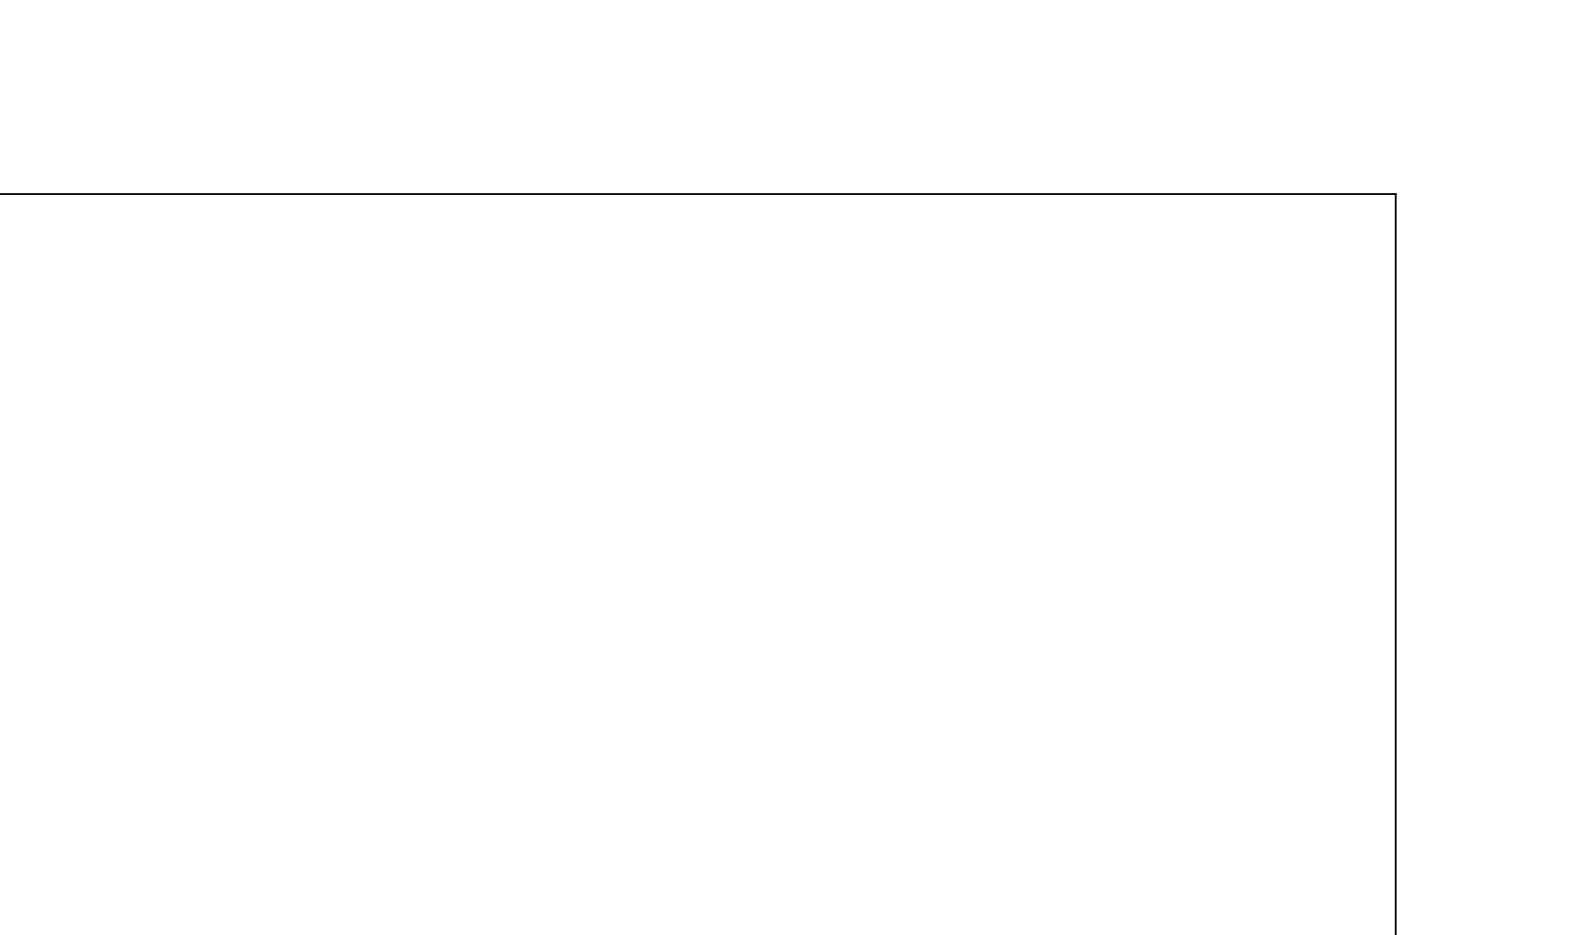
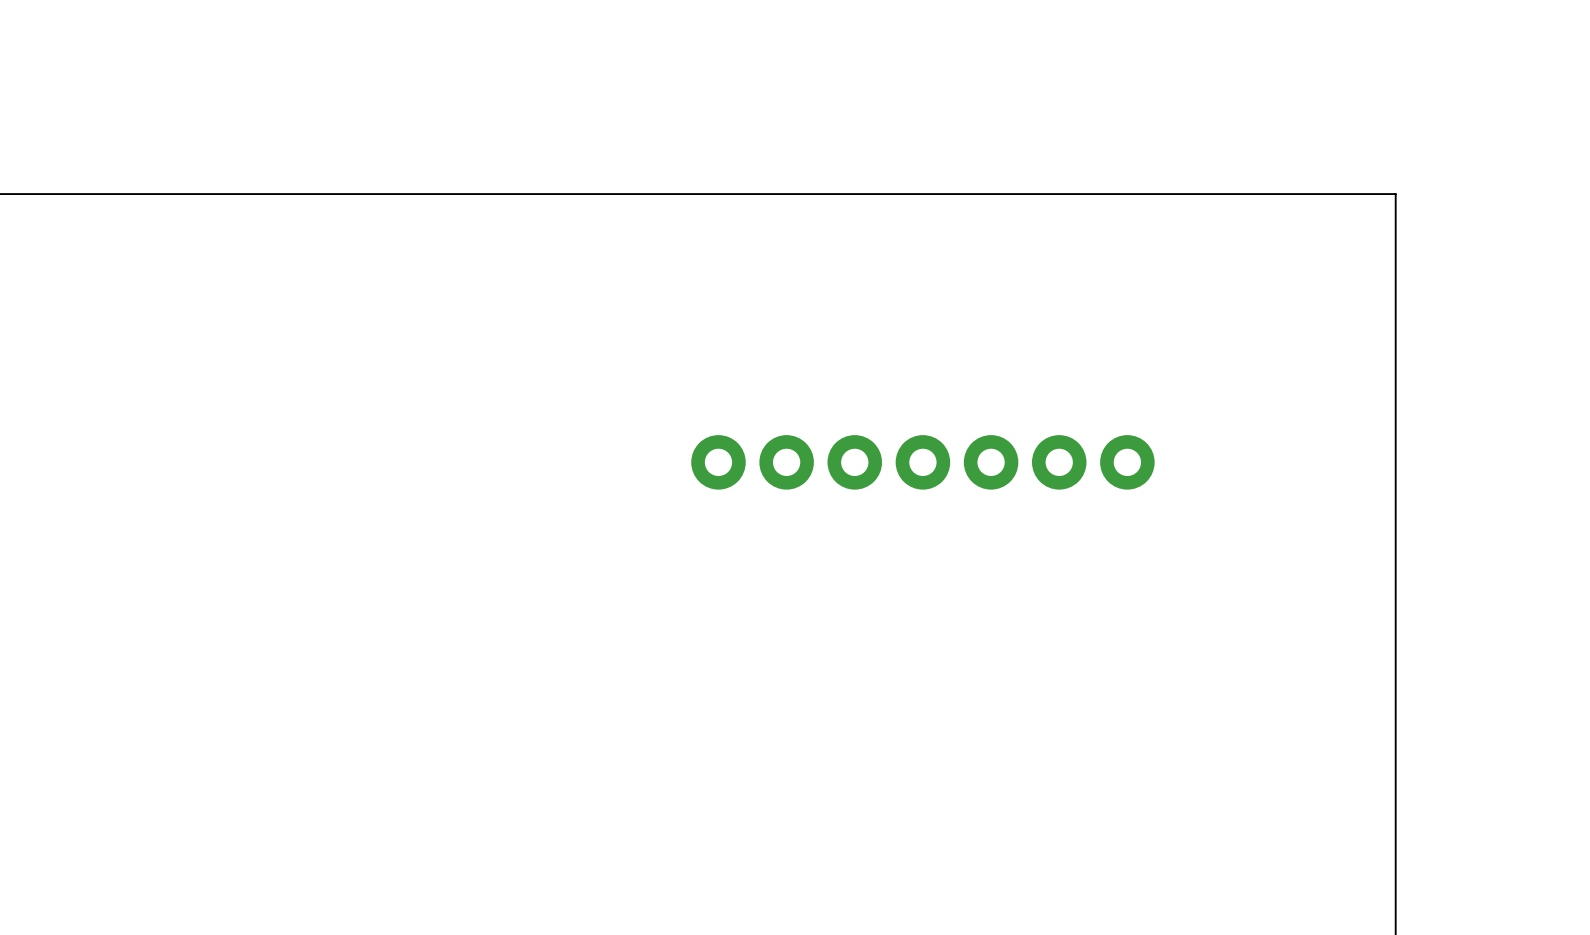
part: none -> (922, 462)

